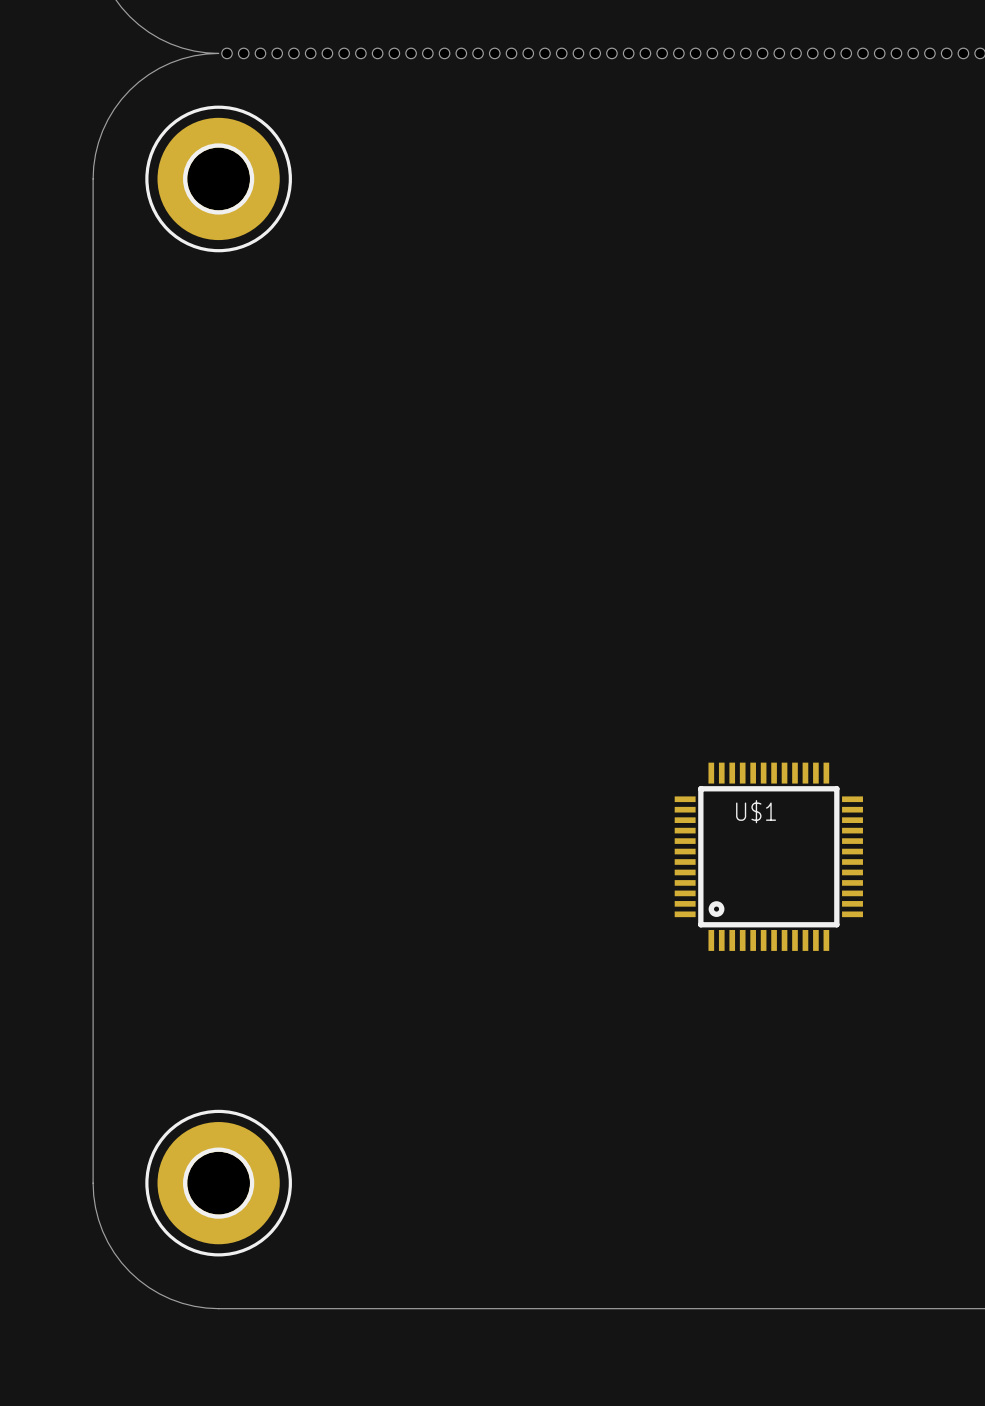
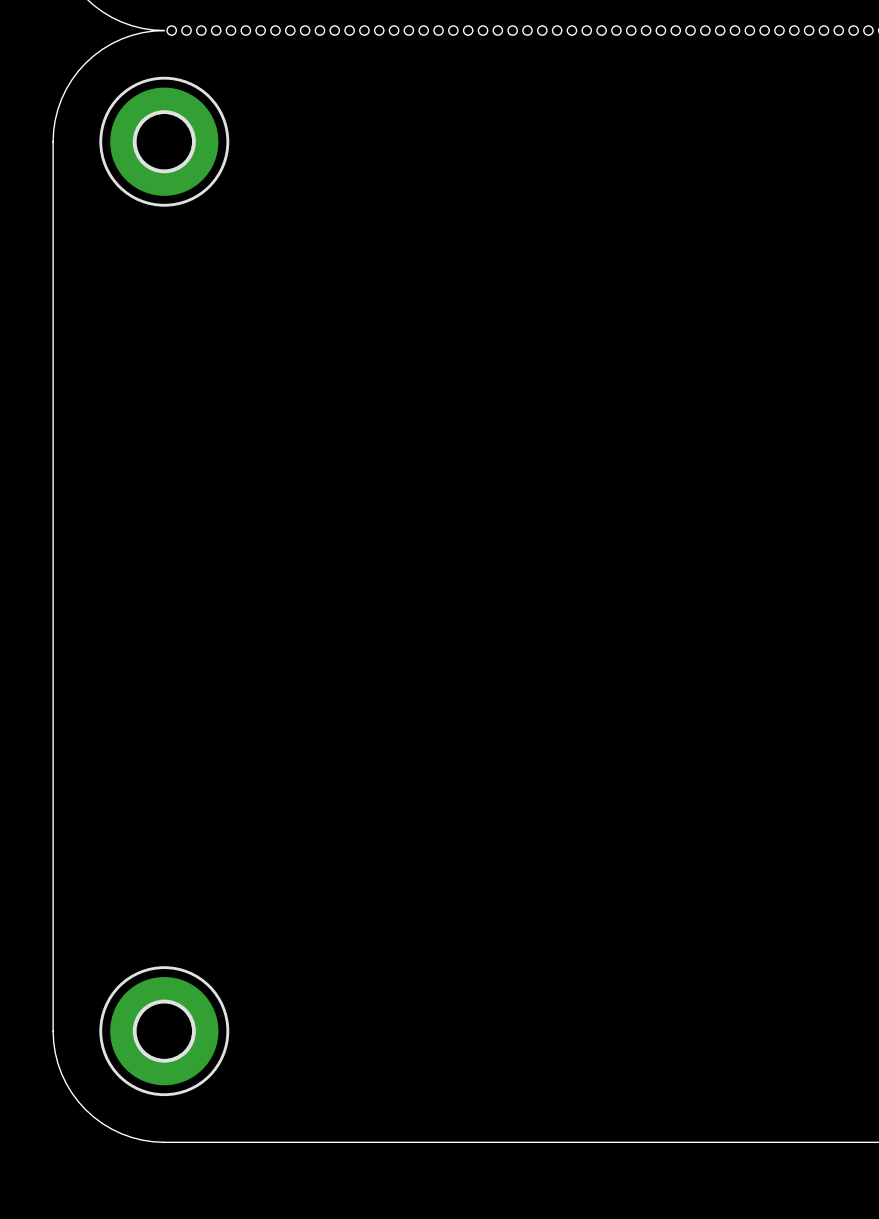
U$1: (768, 856) -> none

